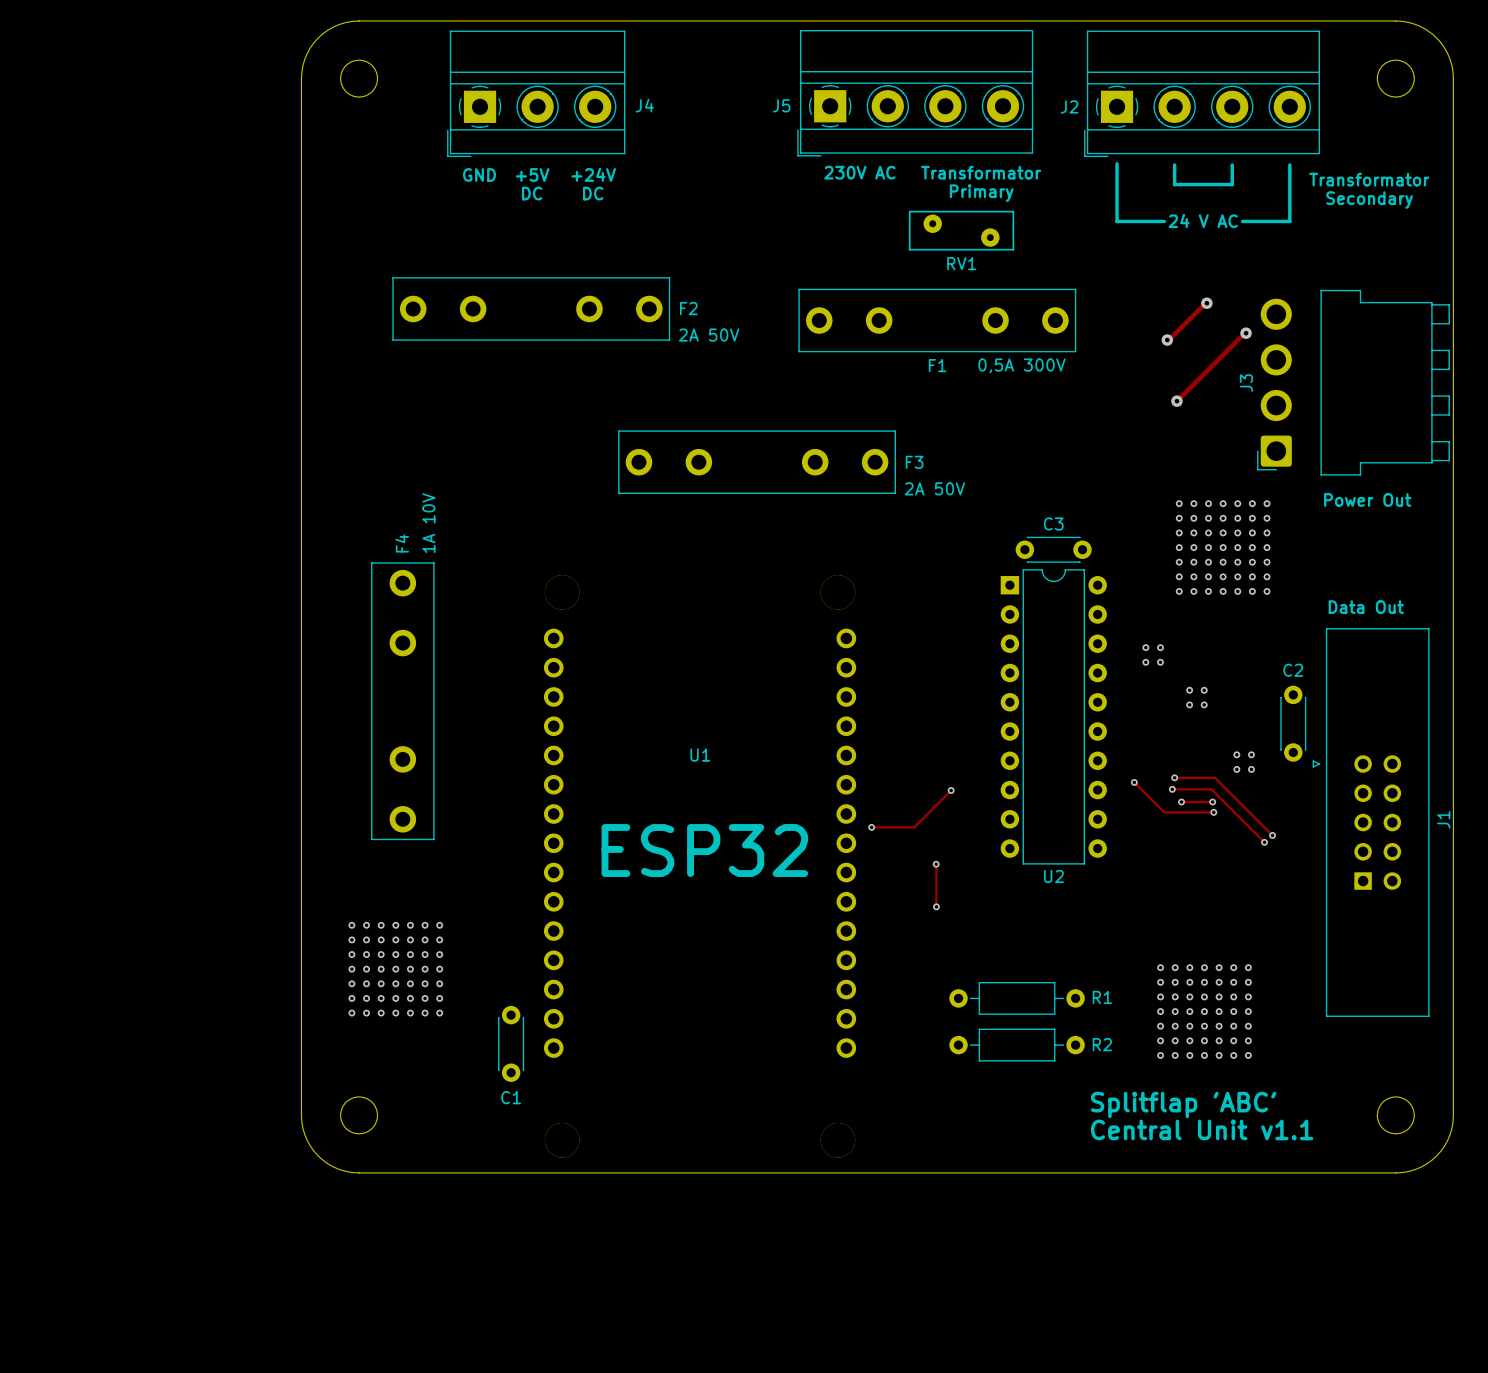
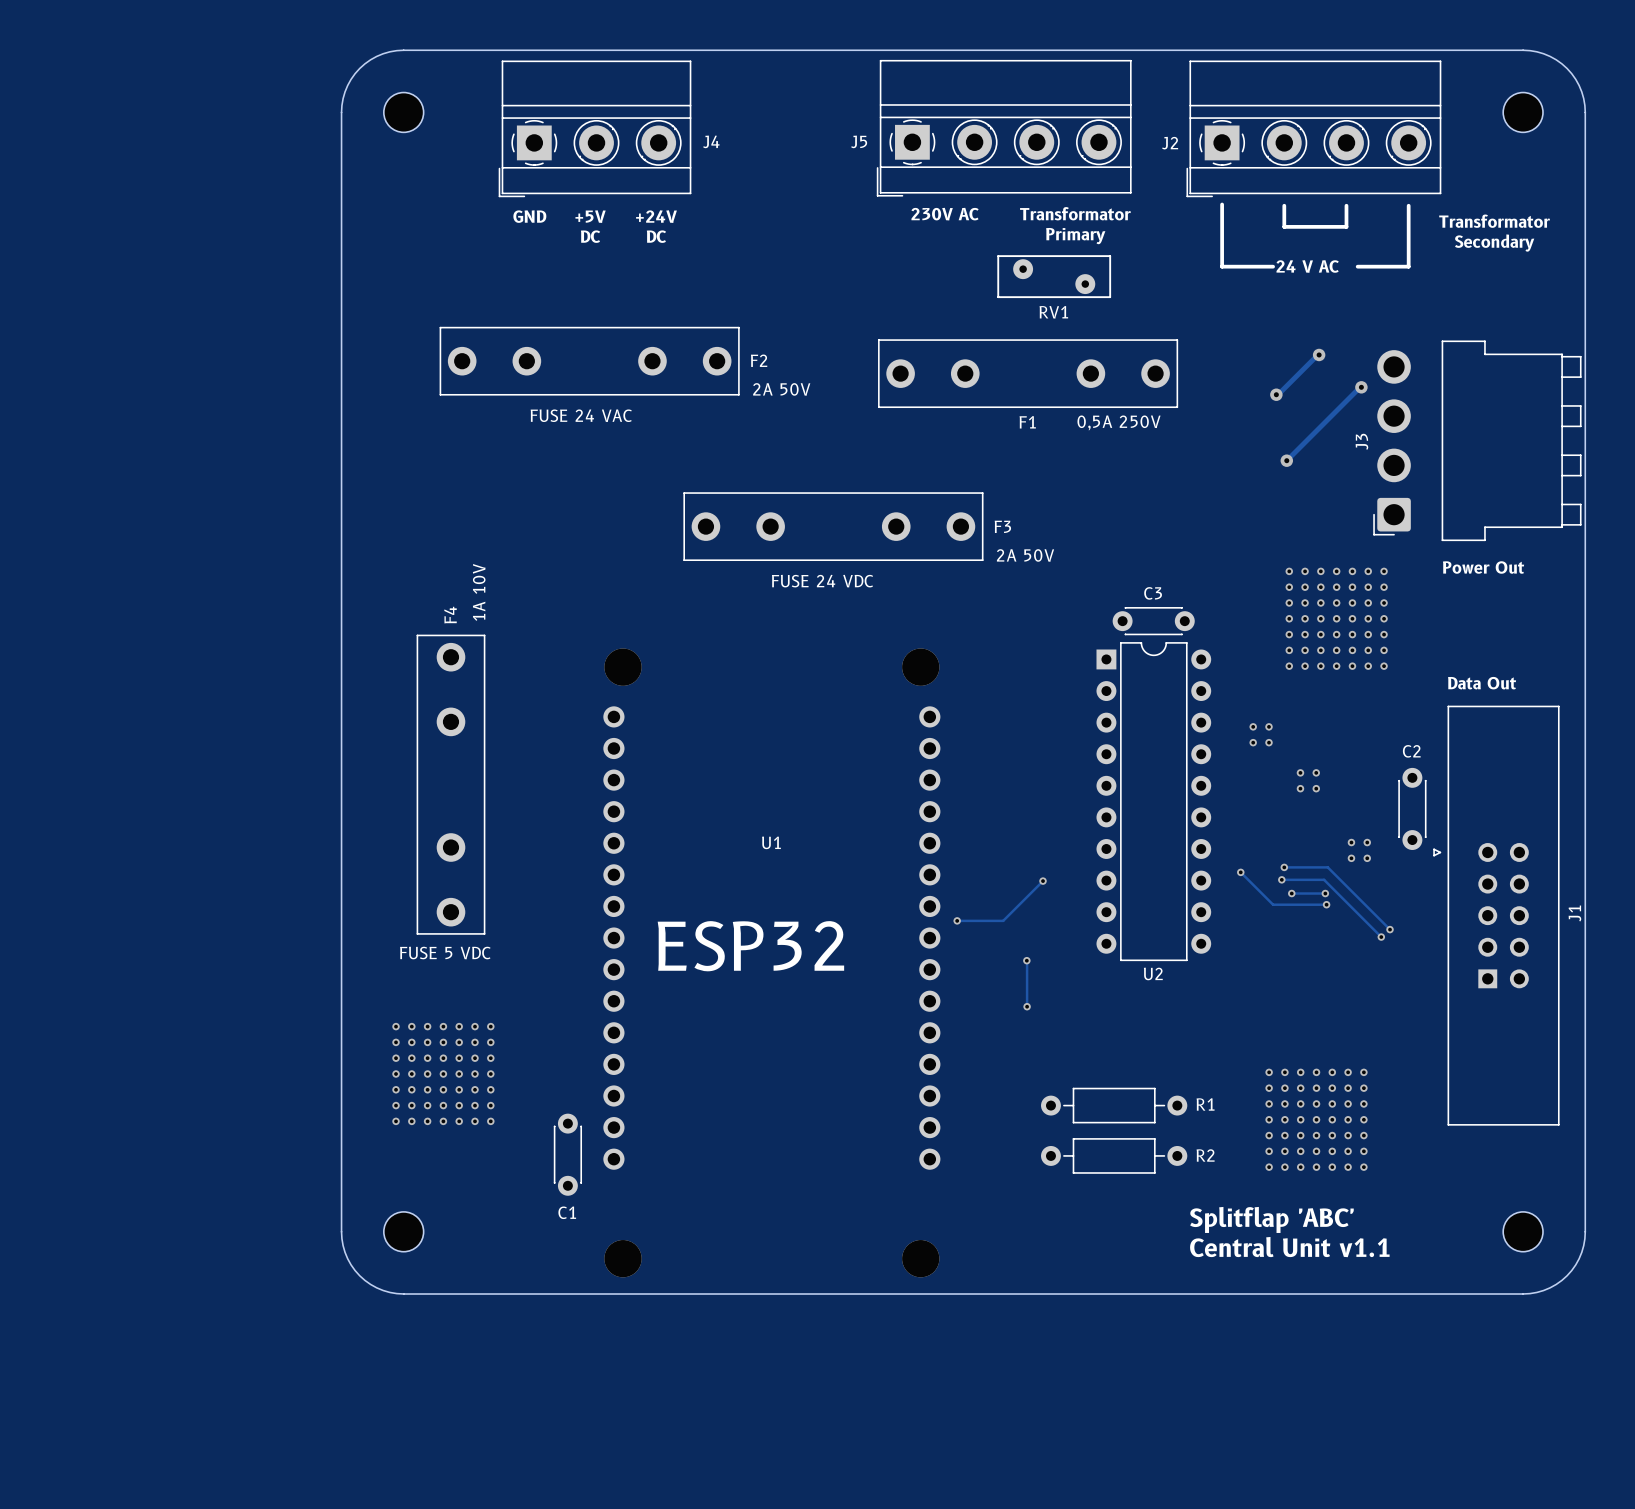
text: none -> FUSE 24 VAC (581, 415)
F1 value: 0,5A 300V (1021, 365) -> 0,5A 250V (1119, 422)
text: none -> FUSE 24 VDC (822, 581)
text: none -> FUSE 5 VDC (445, 953)

